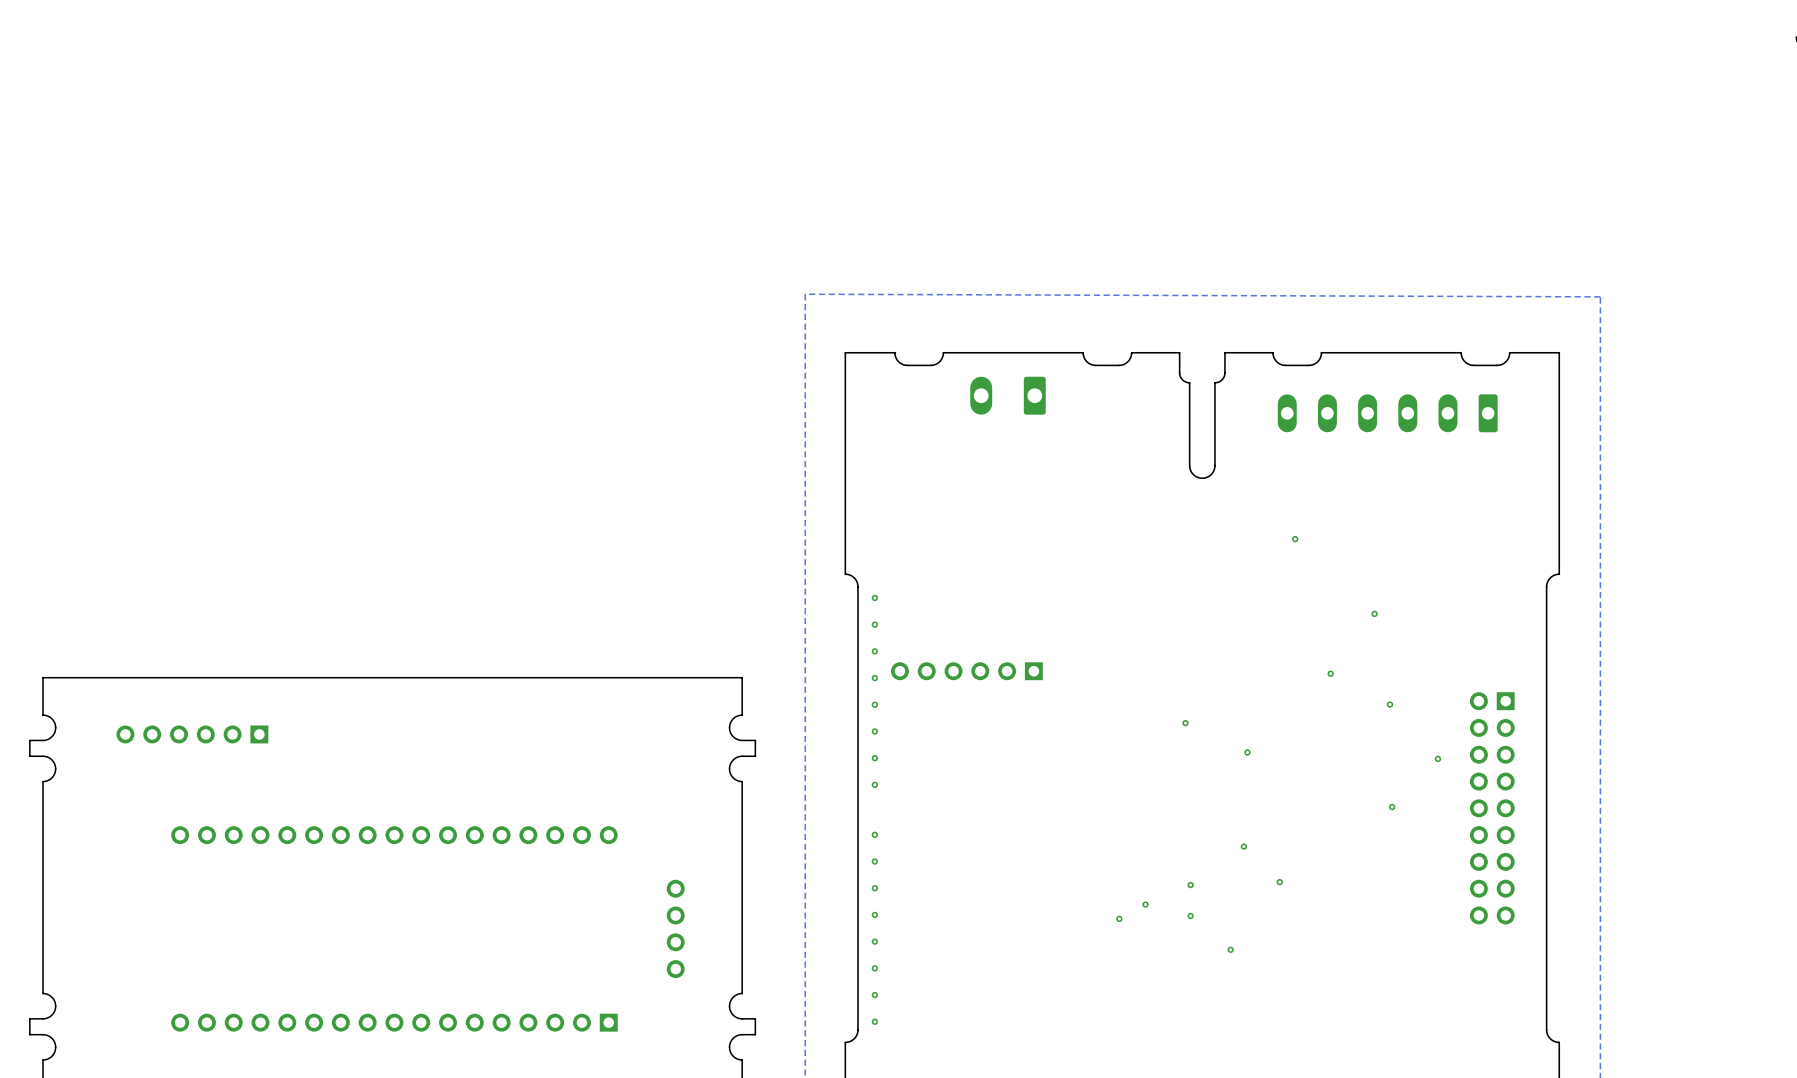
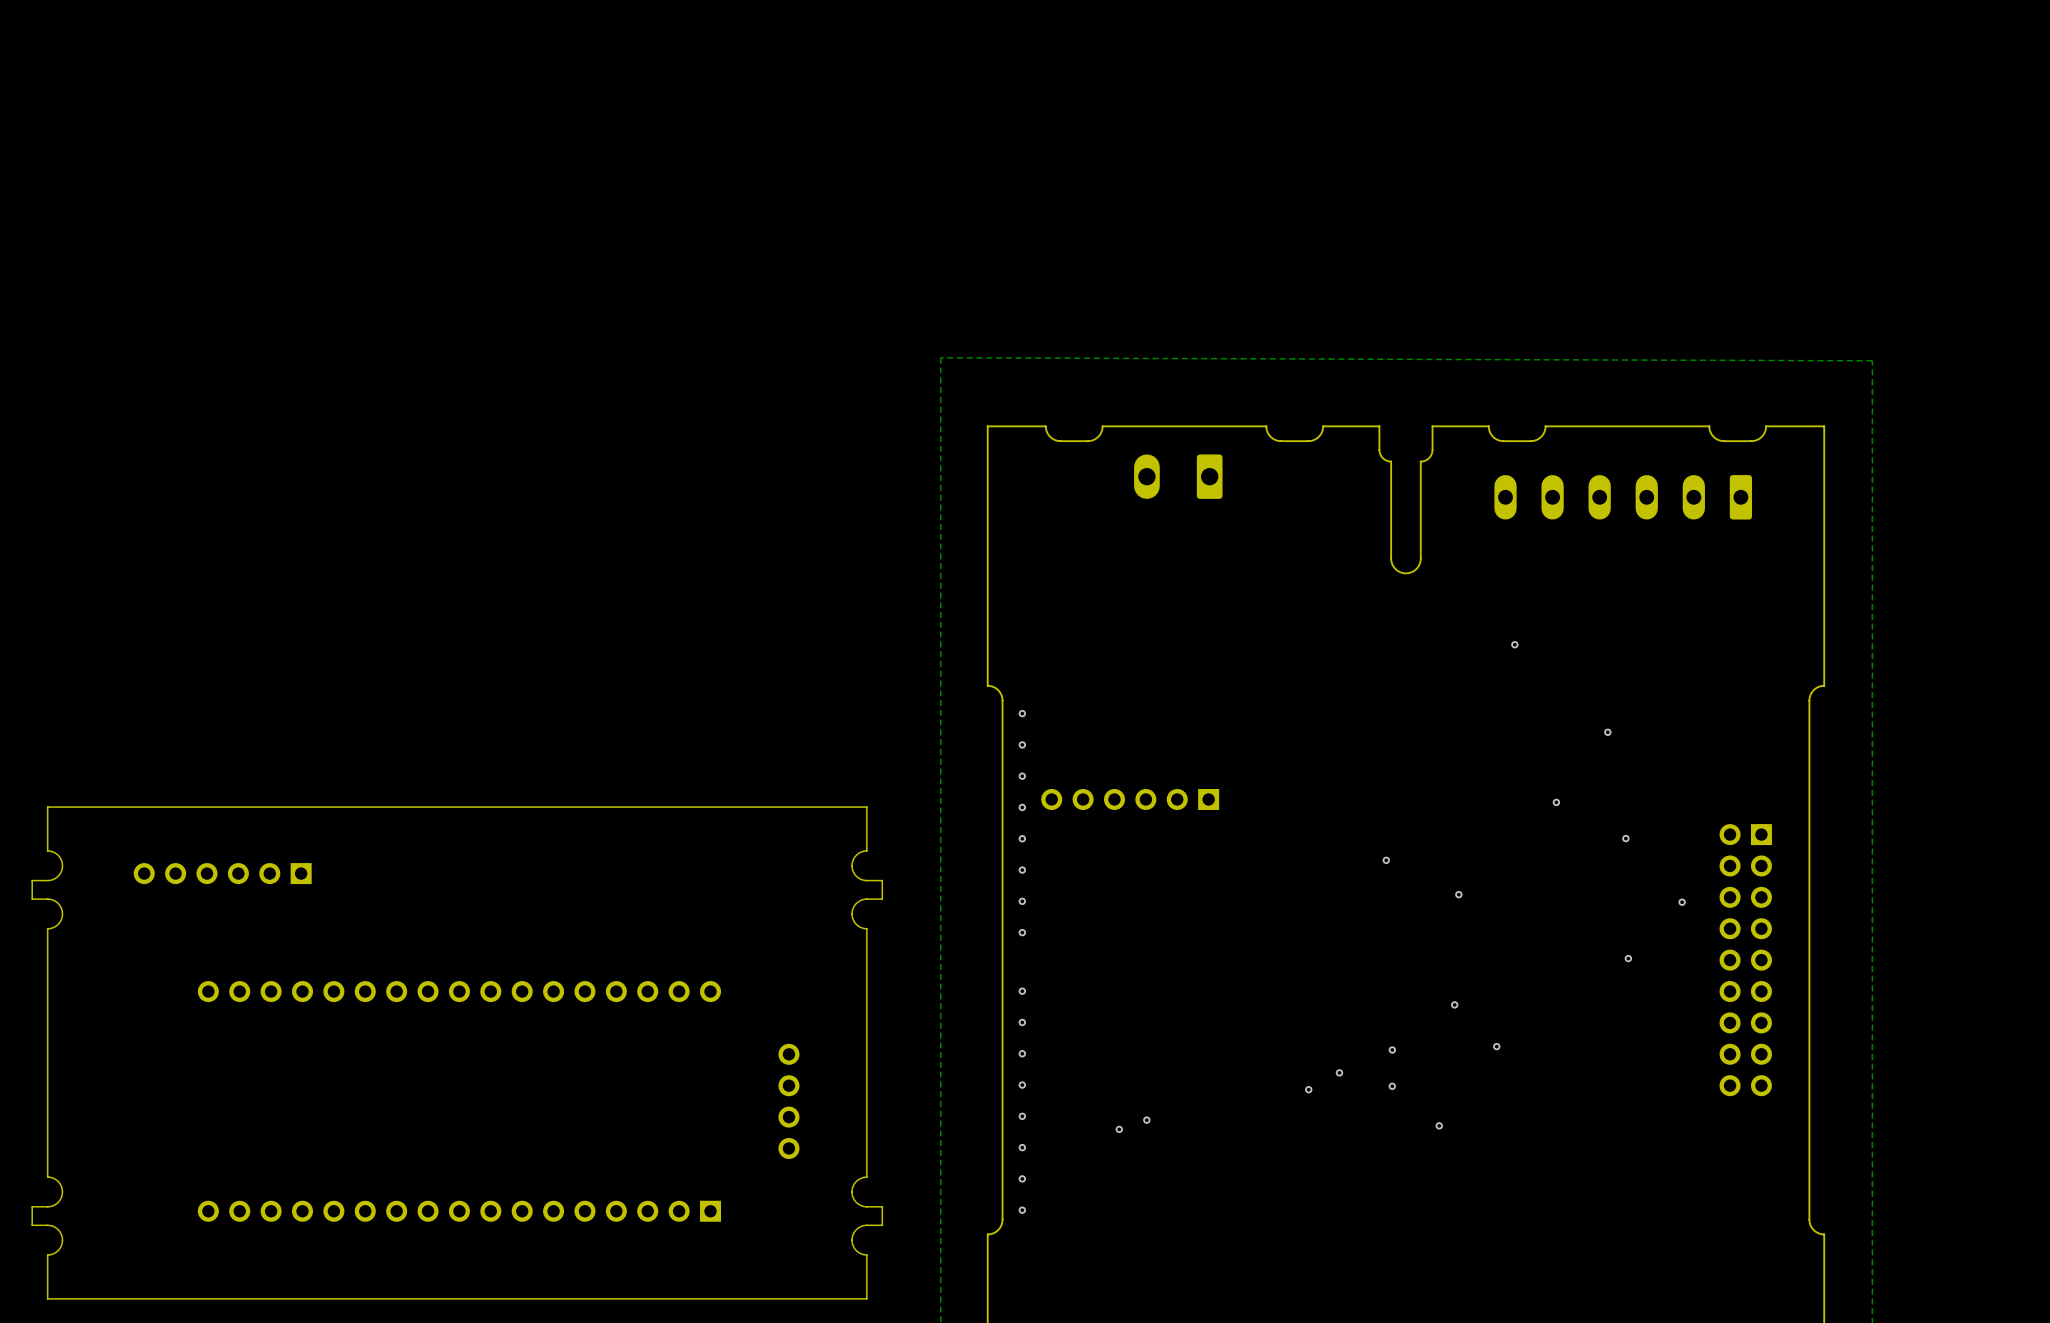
via: none -> (1146, 1120)
via: none -> (1119, 1129)

